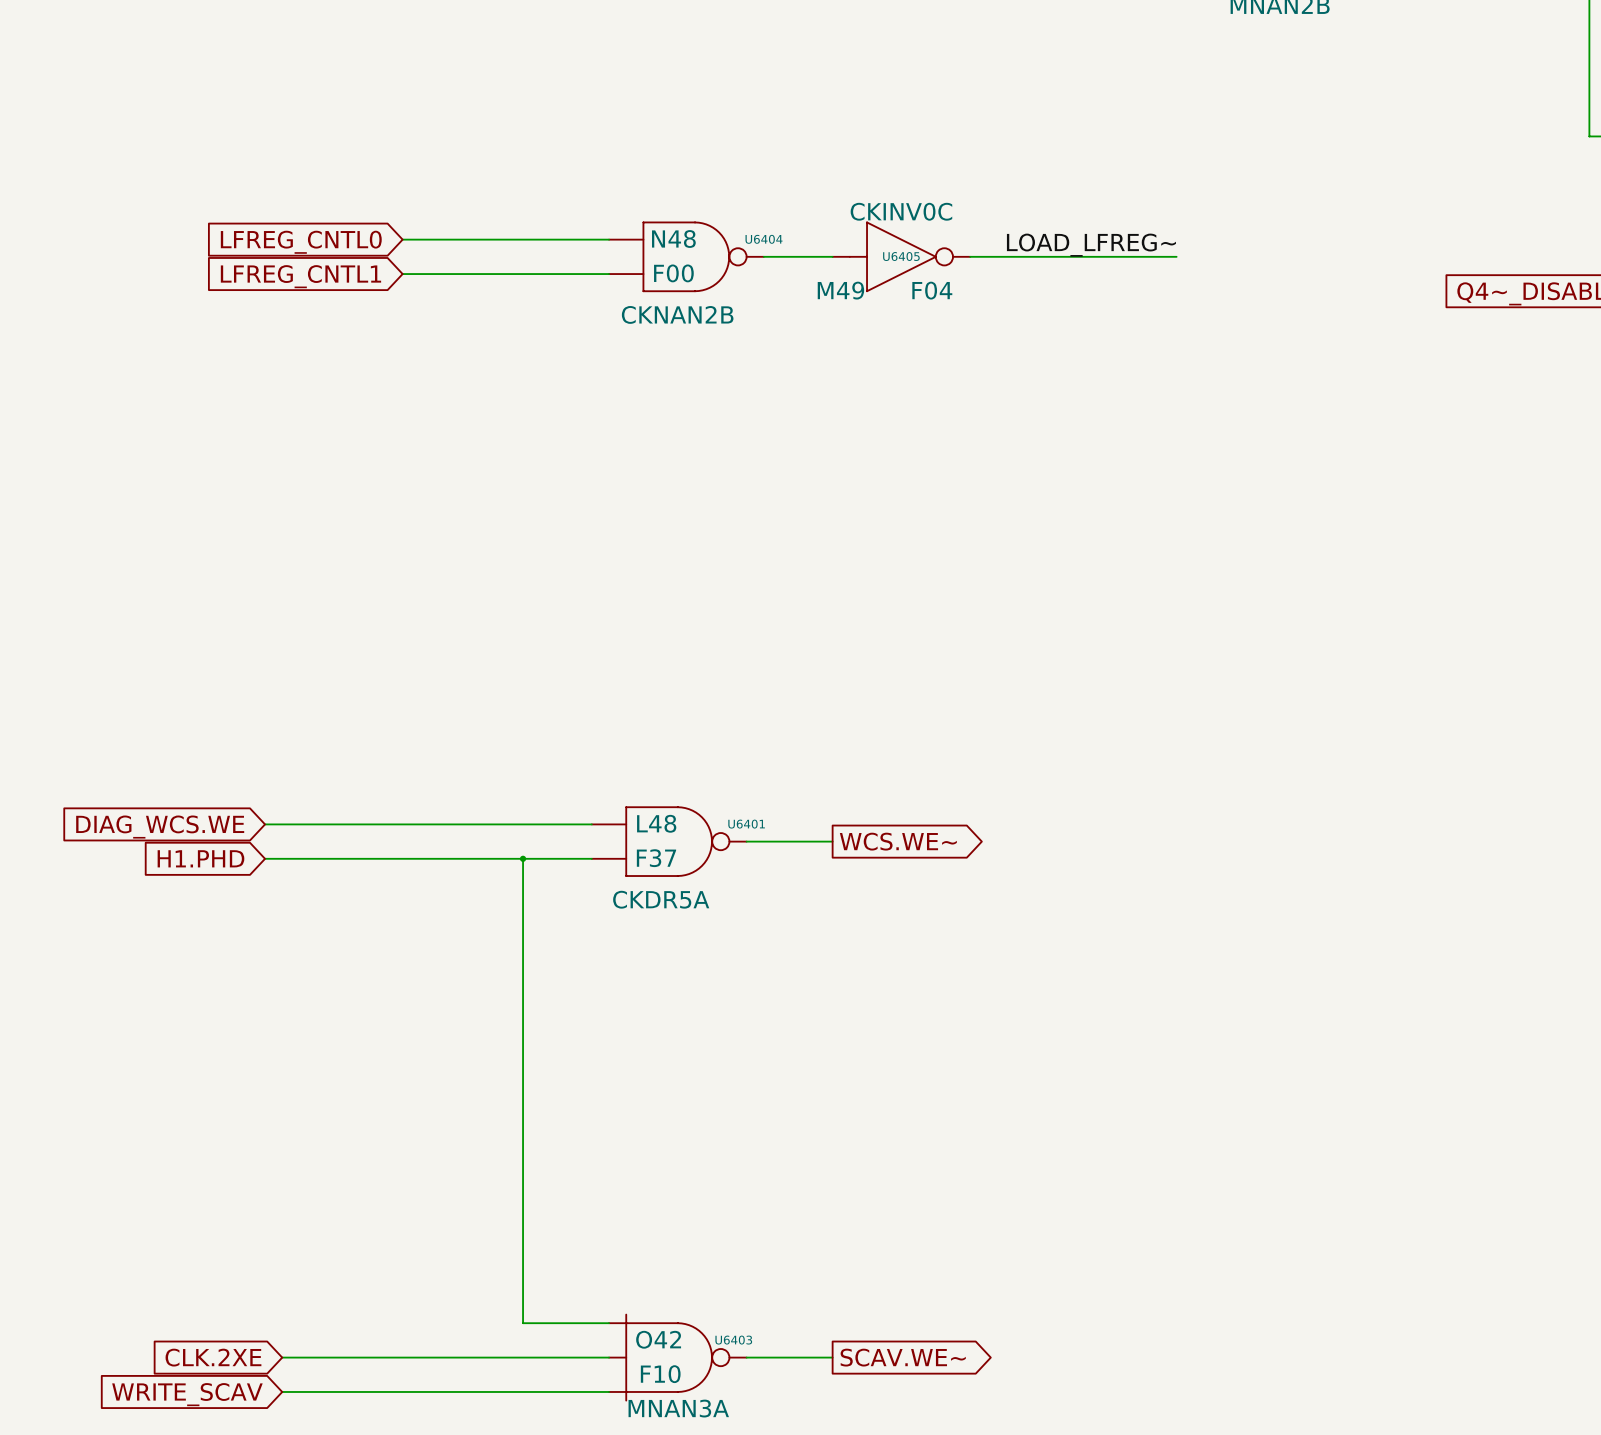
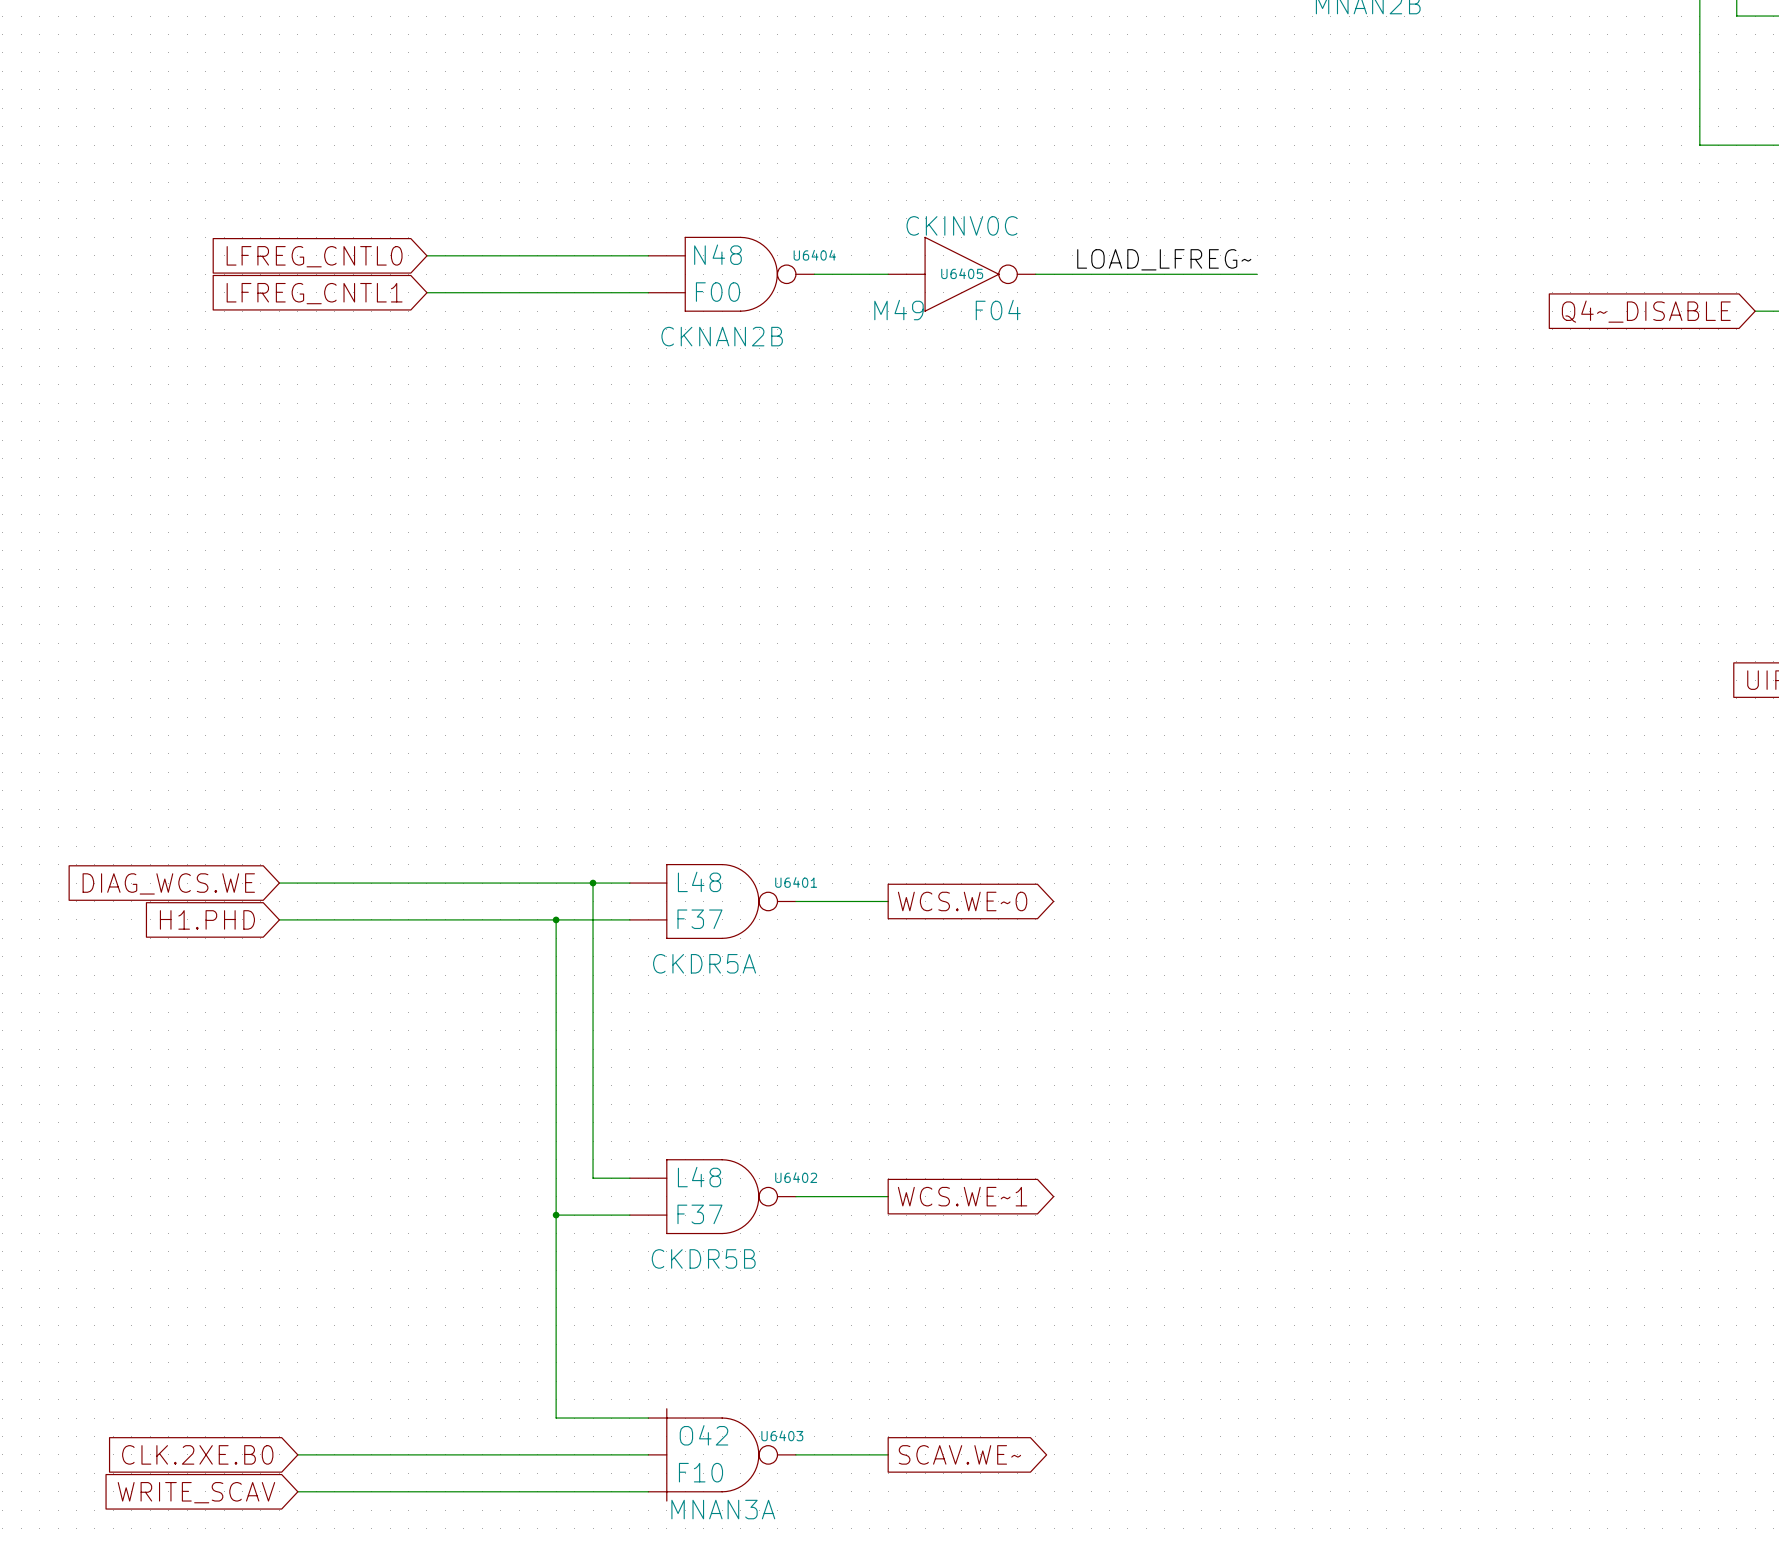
wire: none -> (593, 883) (593, 1178) (629, 1178)
junction: none -> (593, 883)
global label: WCS.WE~ (898, 841) -> WCS.WE~0 (962, 901)
U6402: none -> F37 (712, 1196)
wire: none -> (795, 1196) (888, 1196)
global label: none -> WCS.WE~1 (962, 1196)
wire: none -> (556, 1215) (629, 1215)
junction: none -> (556, 1215)
global label: CLK.2XE (213, 1357) -> CLK.2XE.B0 (197, 1454)

